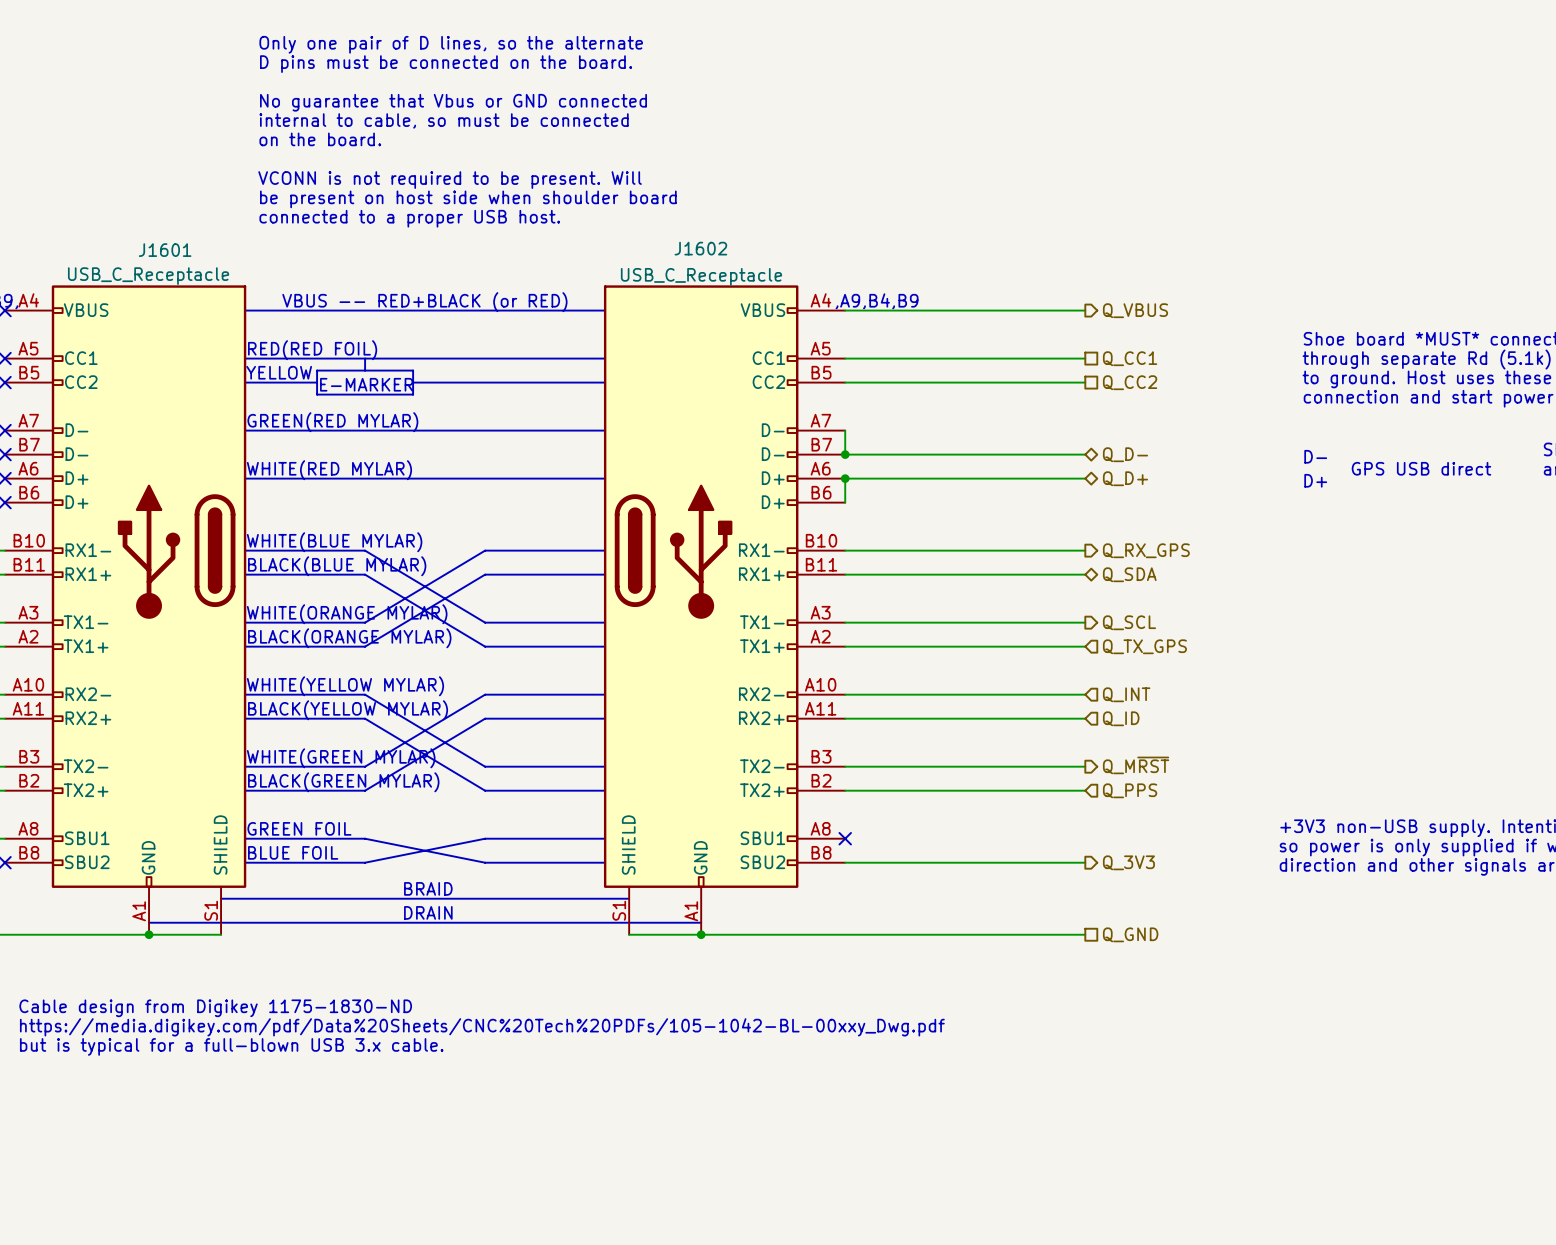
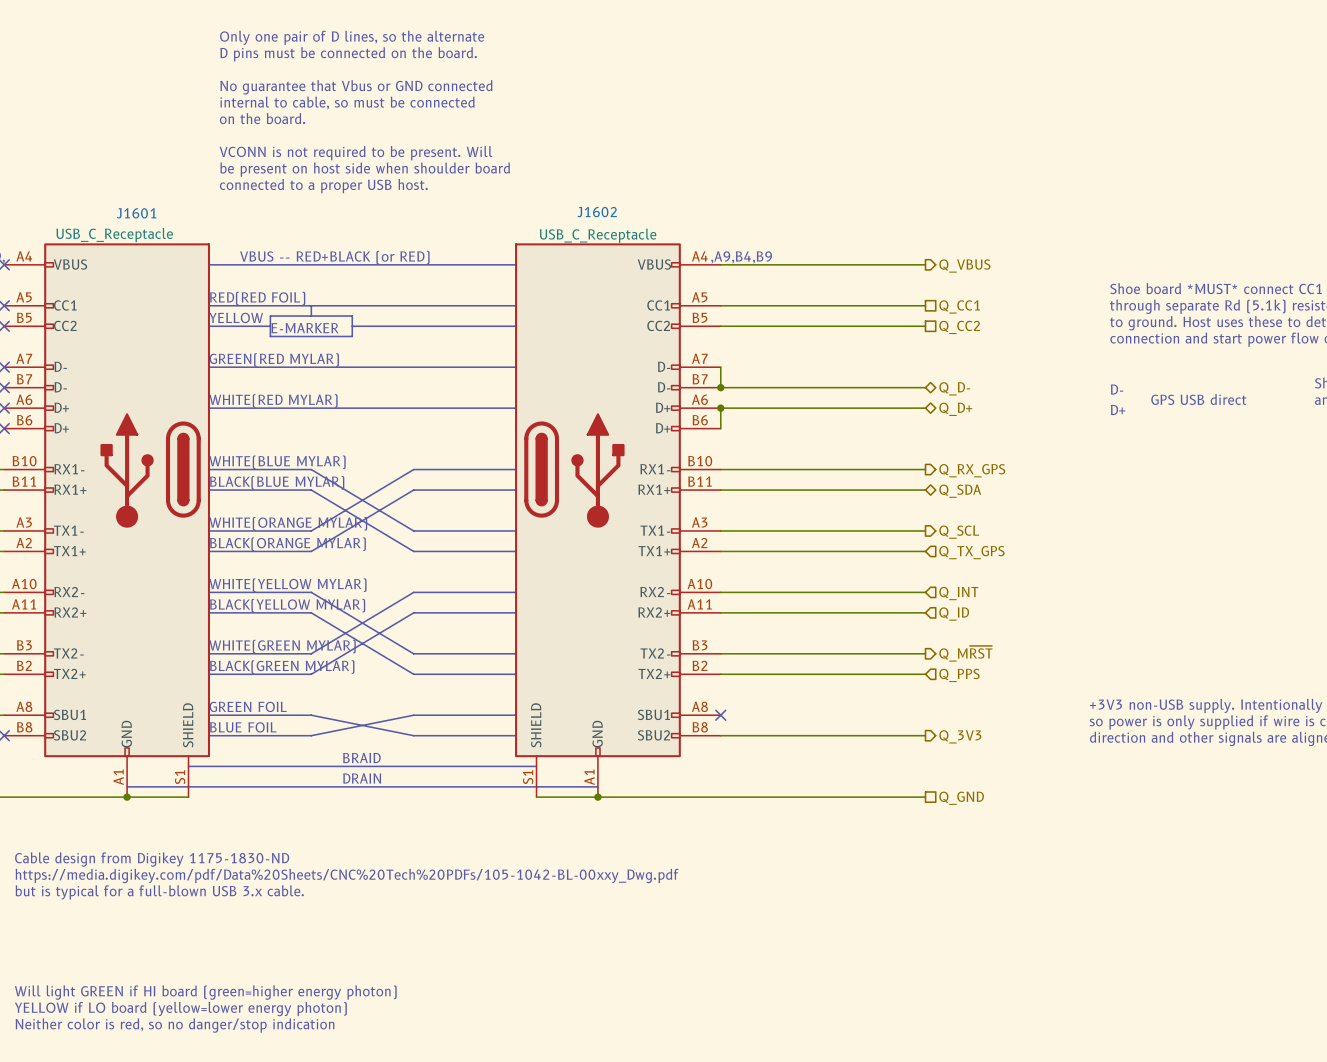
text: none -> Will light GREEN if HI board (green=higher energy photon) (205, 992)
text: none -> YELLOW if LO board (yellow=lower energy photon) (180, 1009)
text: none -> Neither color is red, so no danger/stop indication (174, 1025)

